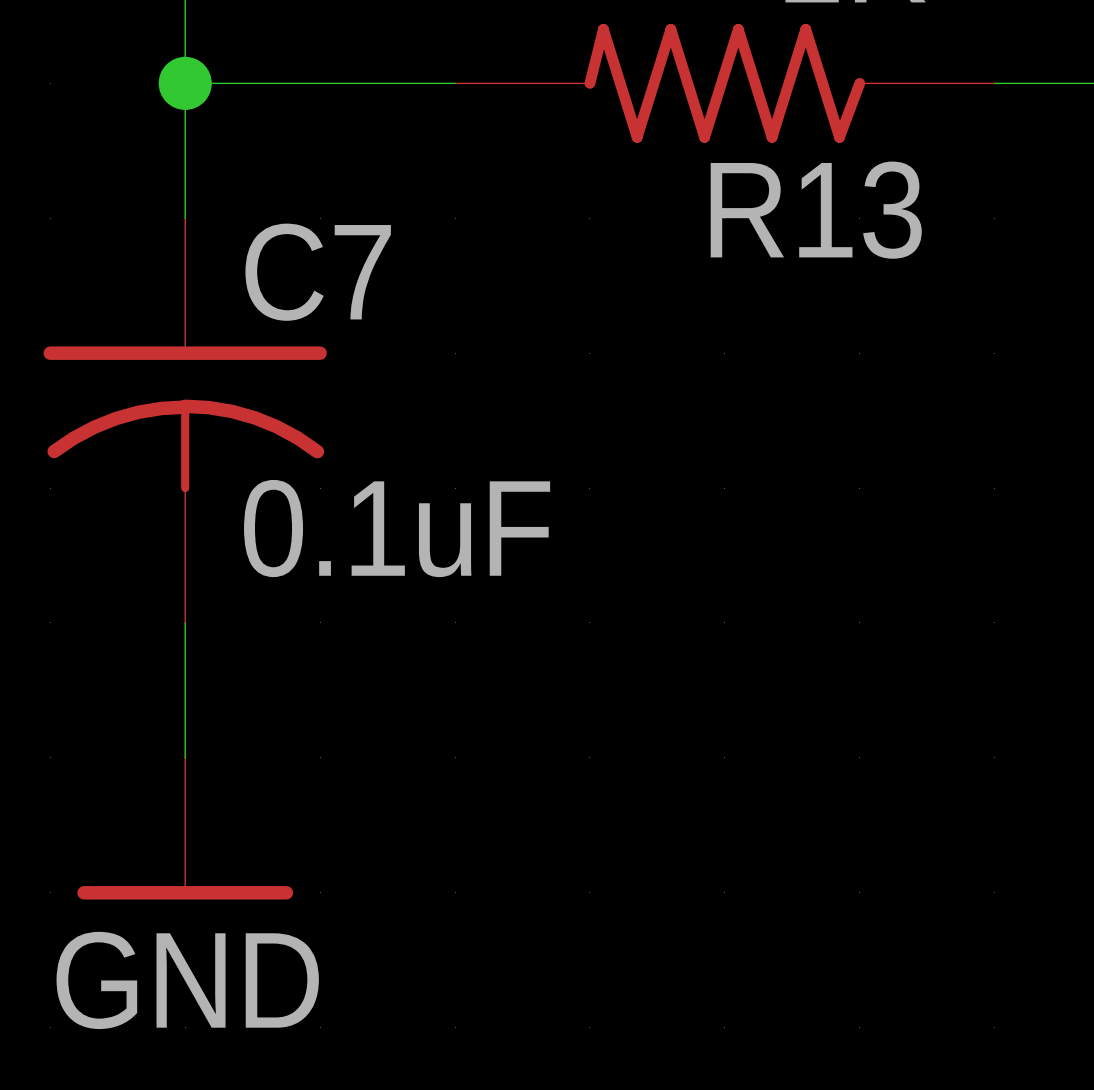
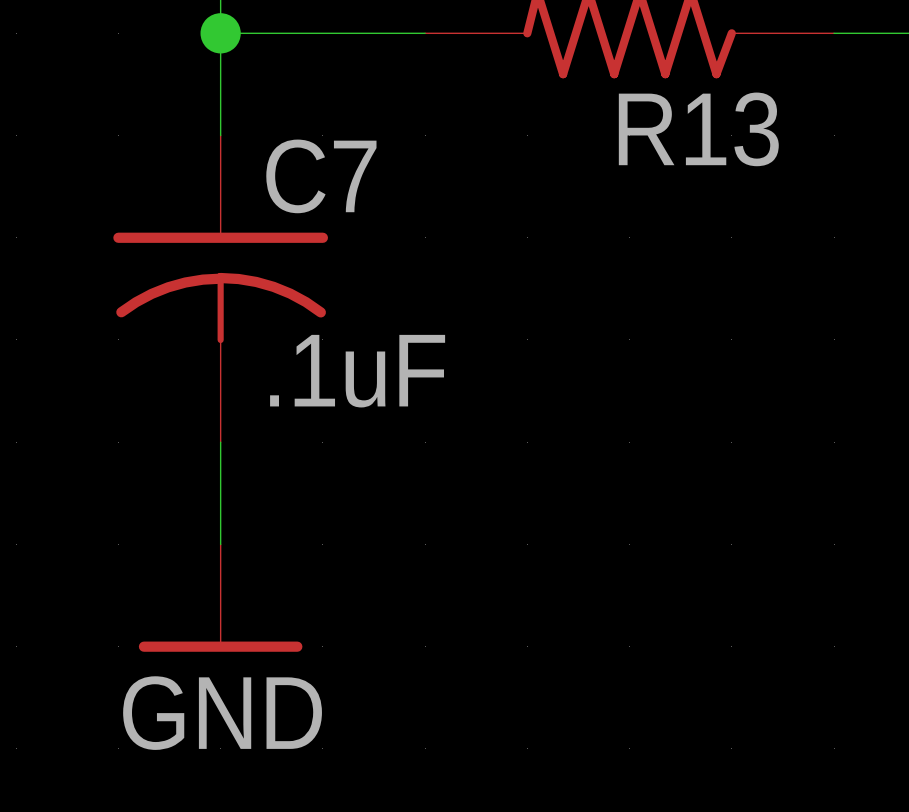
C7 value: 0.1uF (397, 528) -> .1uF (357, 371)

